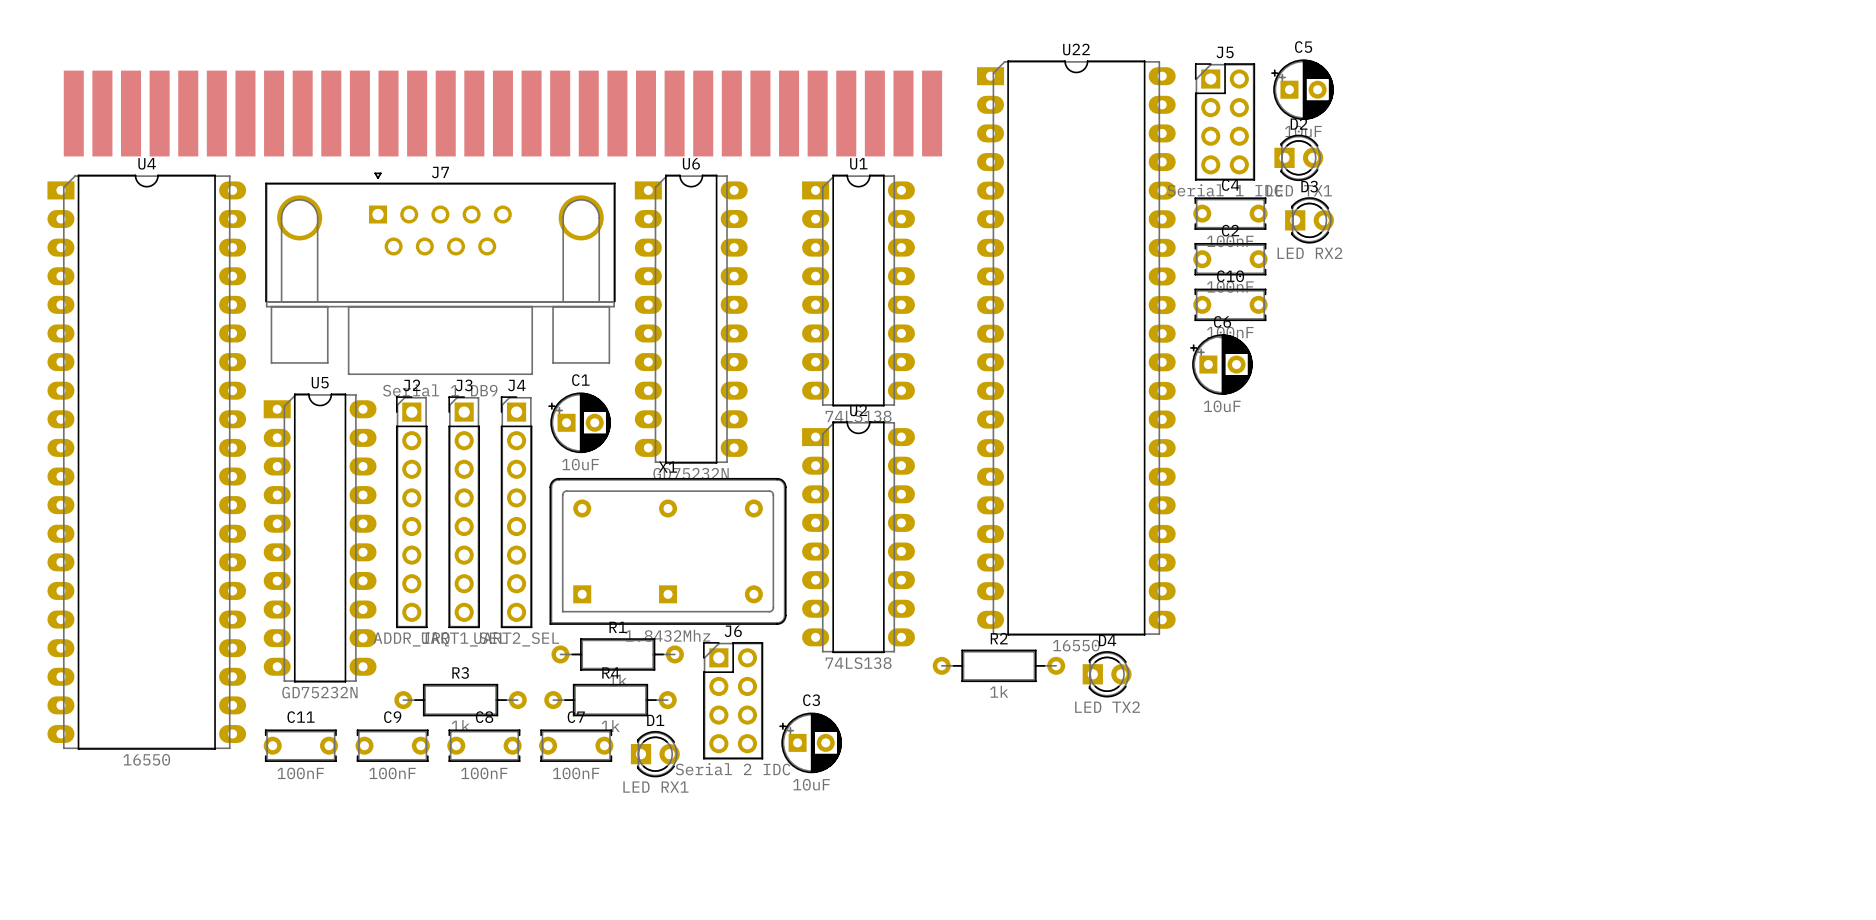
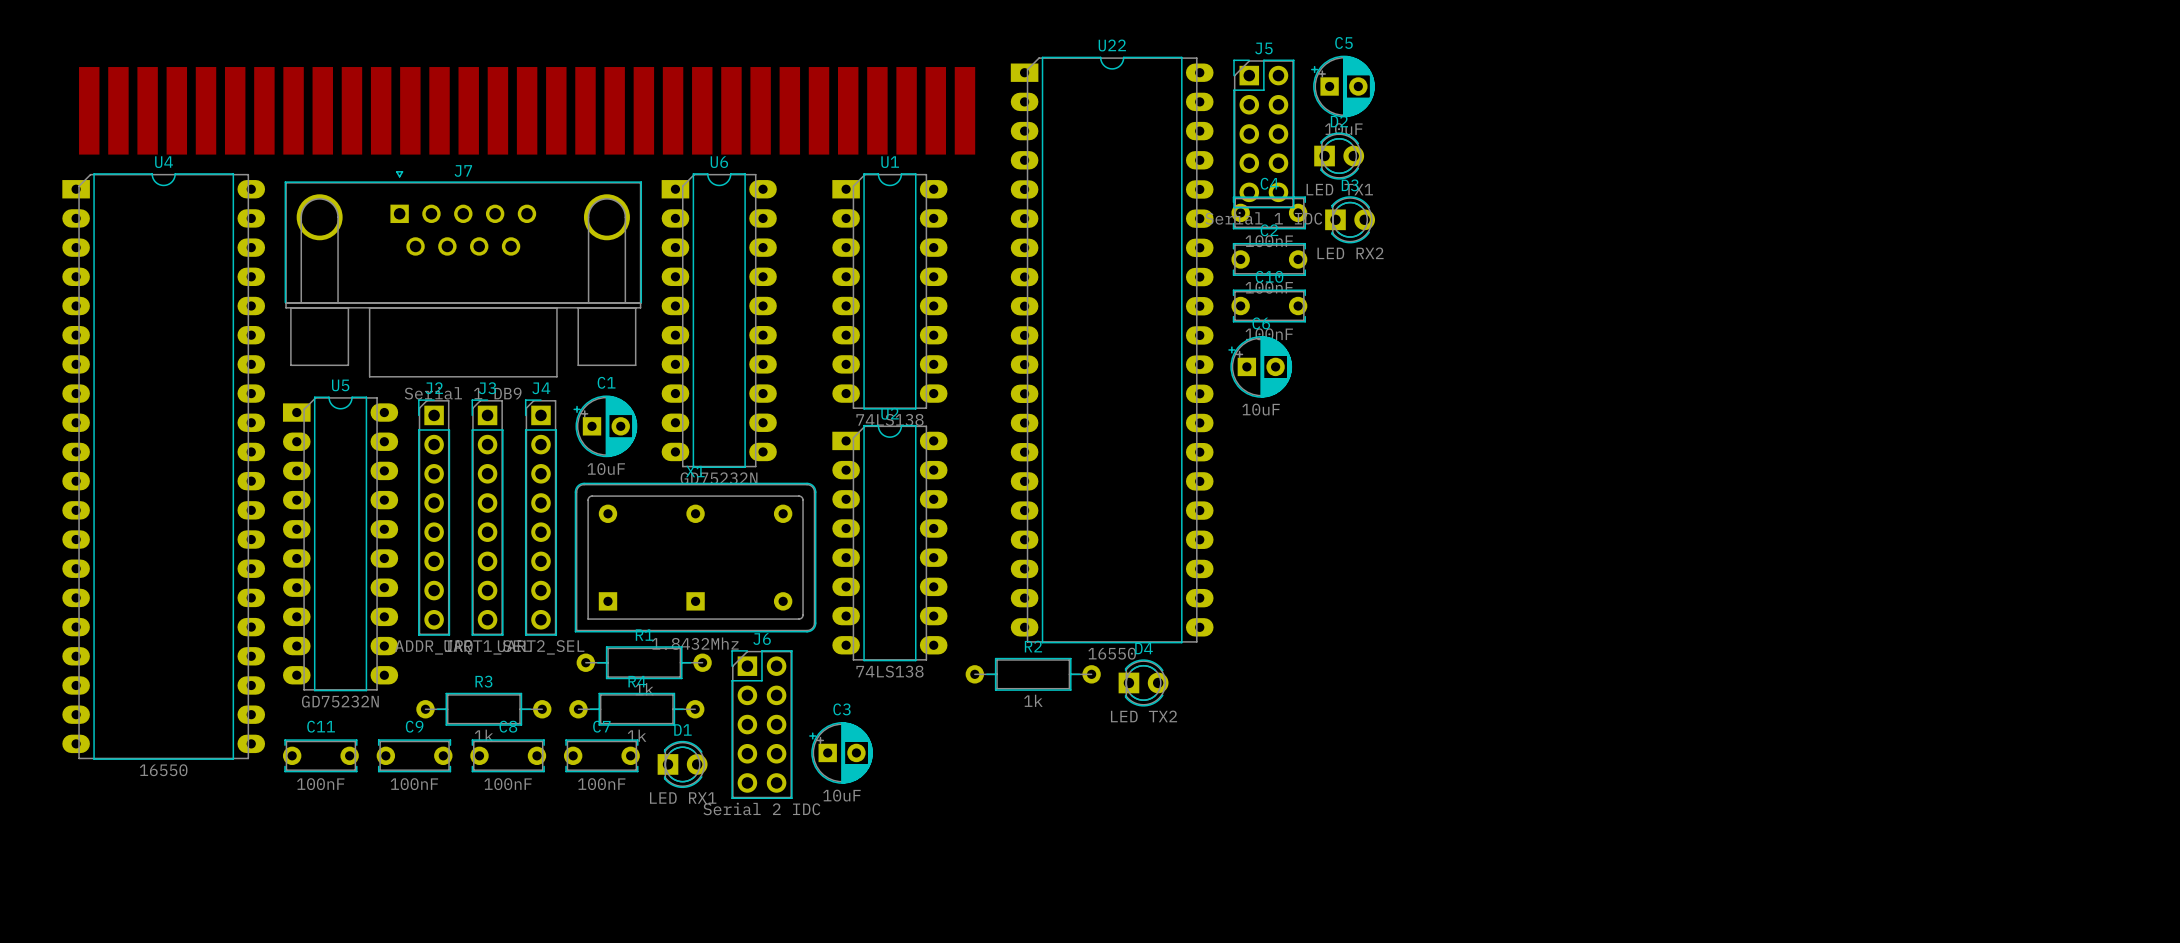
J5 footprint: [1195, 63, 1256, 181] -> [1233, 59, 1295, 209]
J6 footprint: [703, 642, 764, 760] -> [731, 650, 793, 799]

